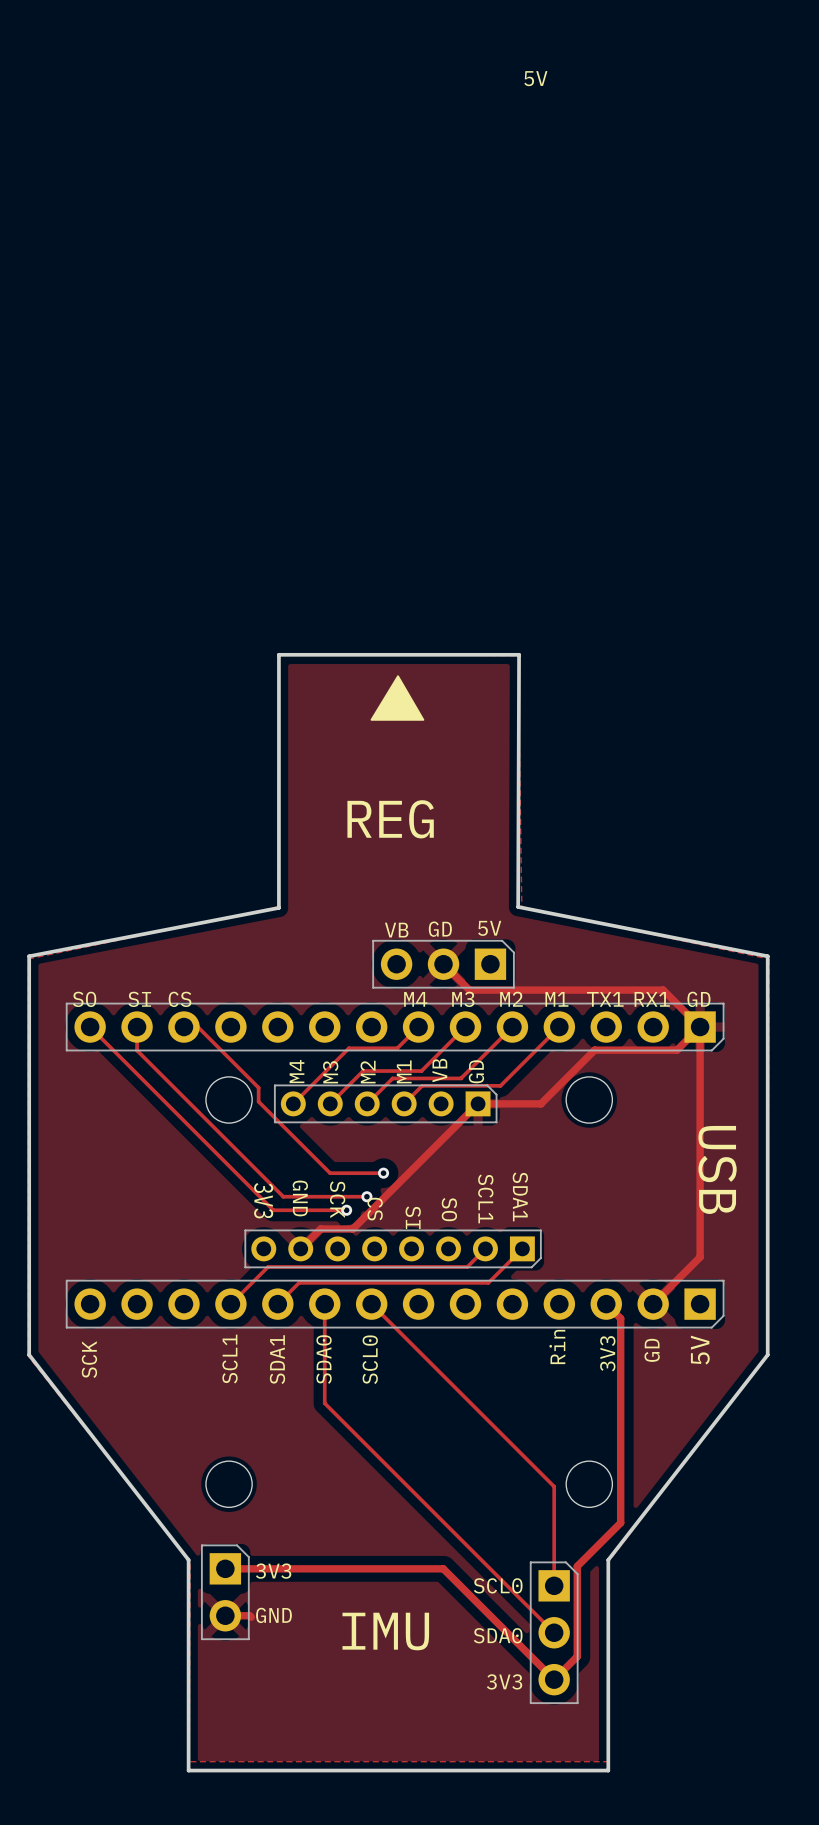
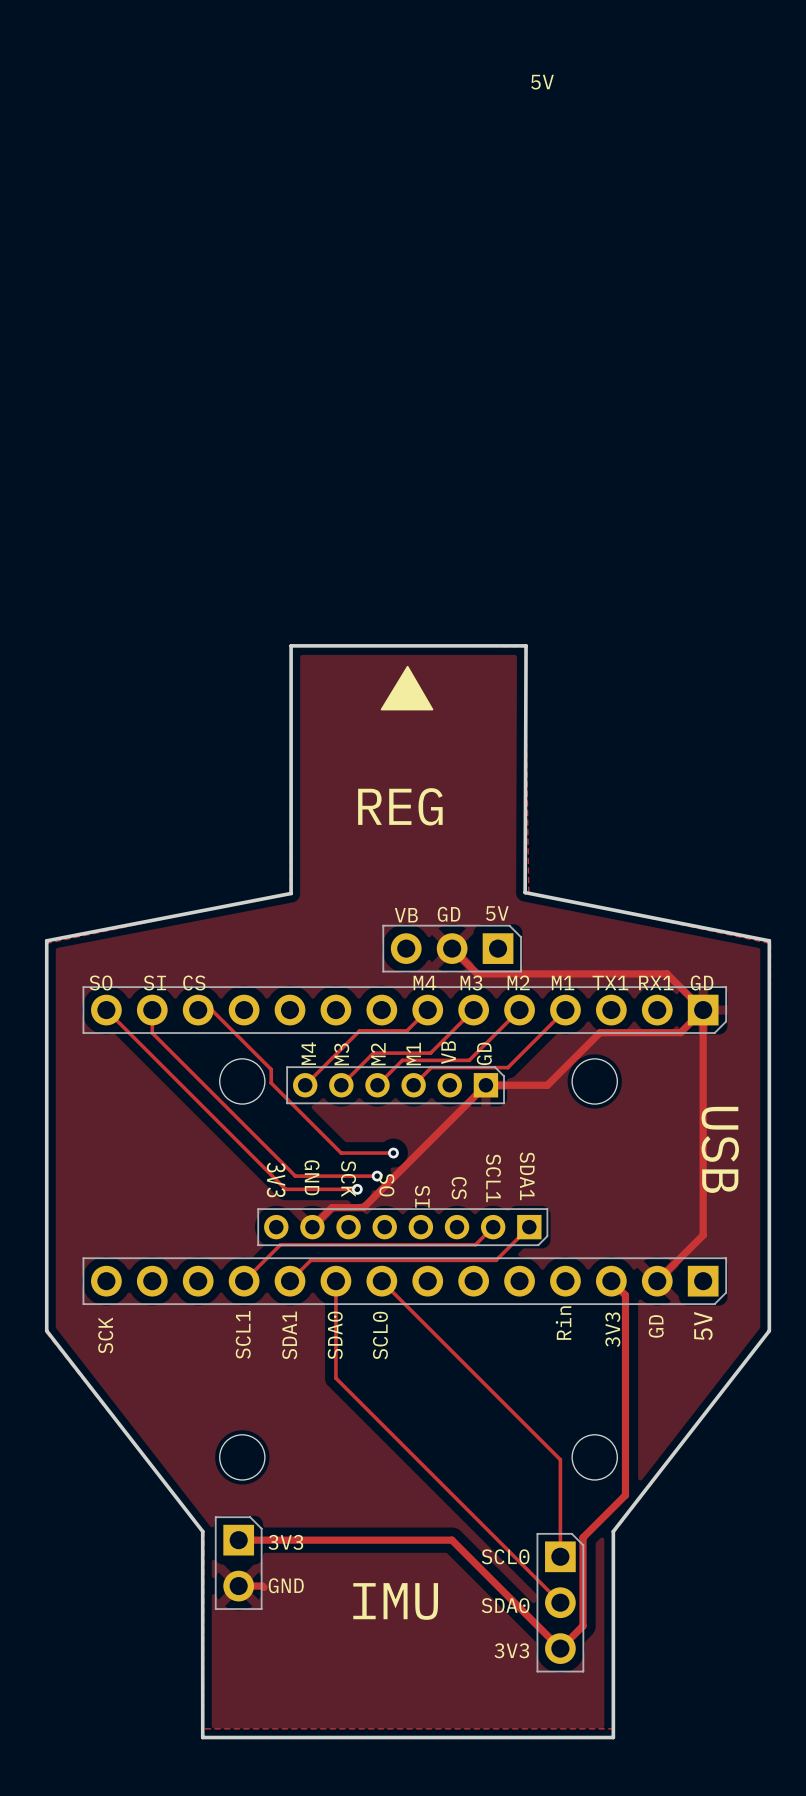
text: CS (375, 1209) -> SO (386, 1185)
text: SO (449, 1209) -> CS (459, 1188)

